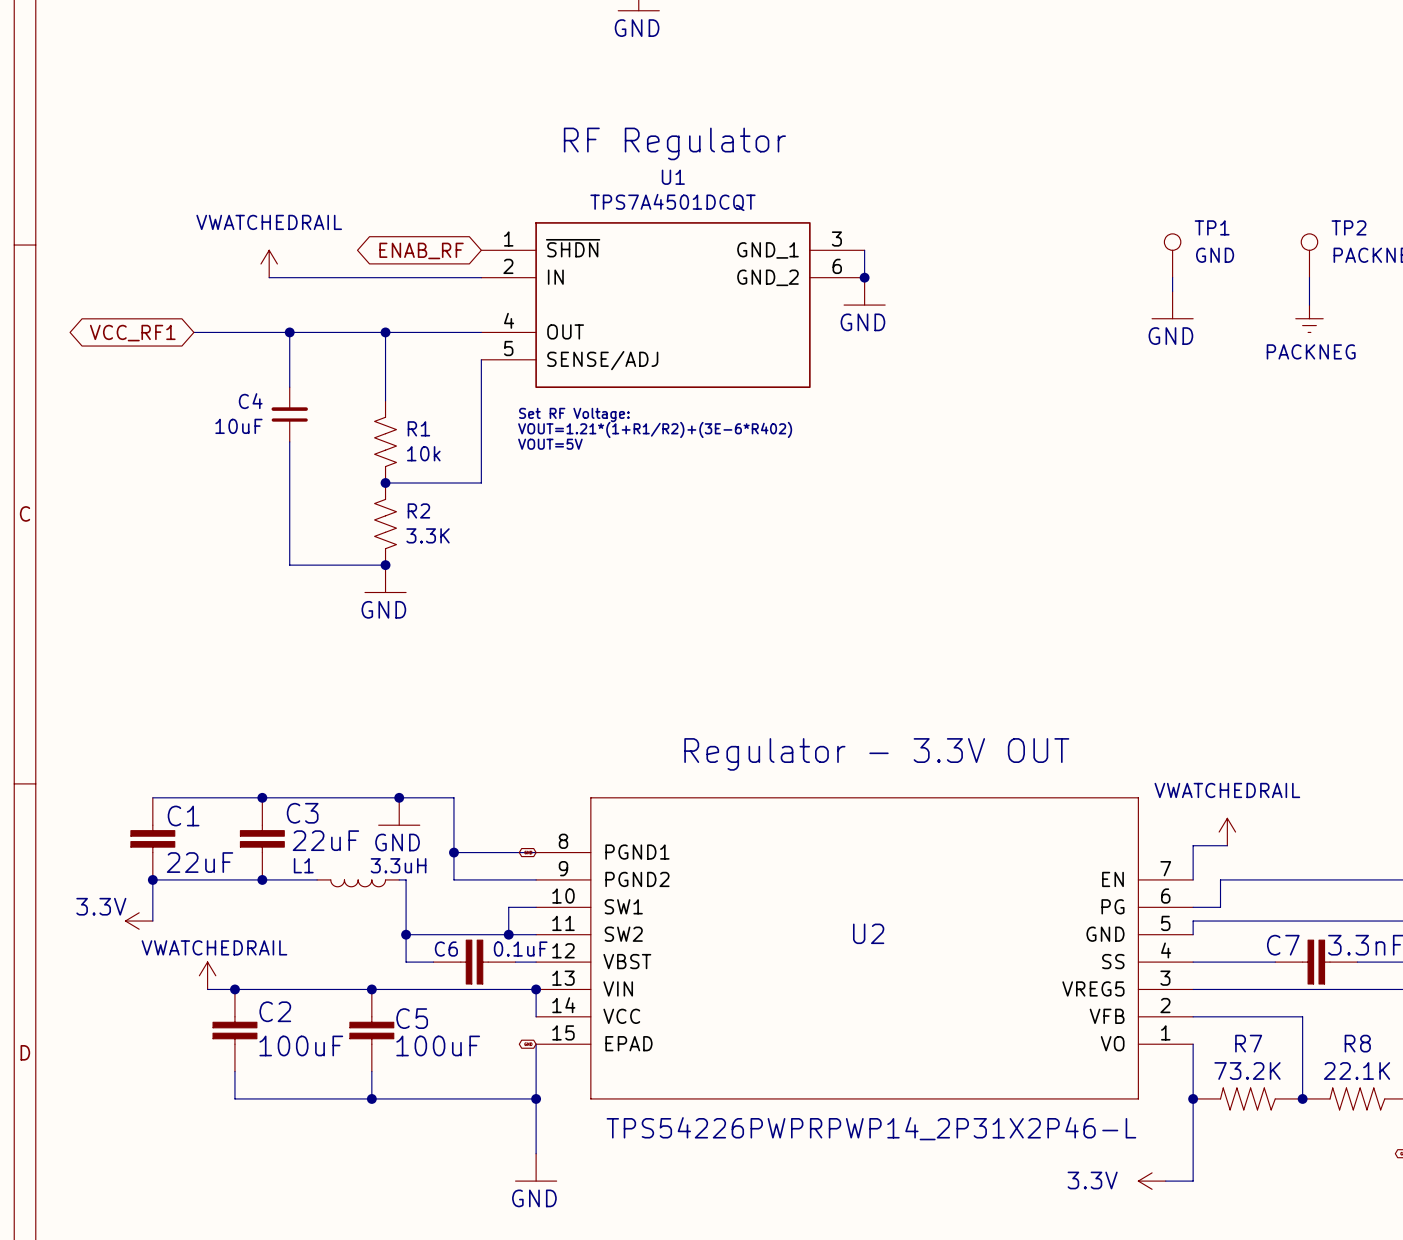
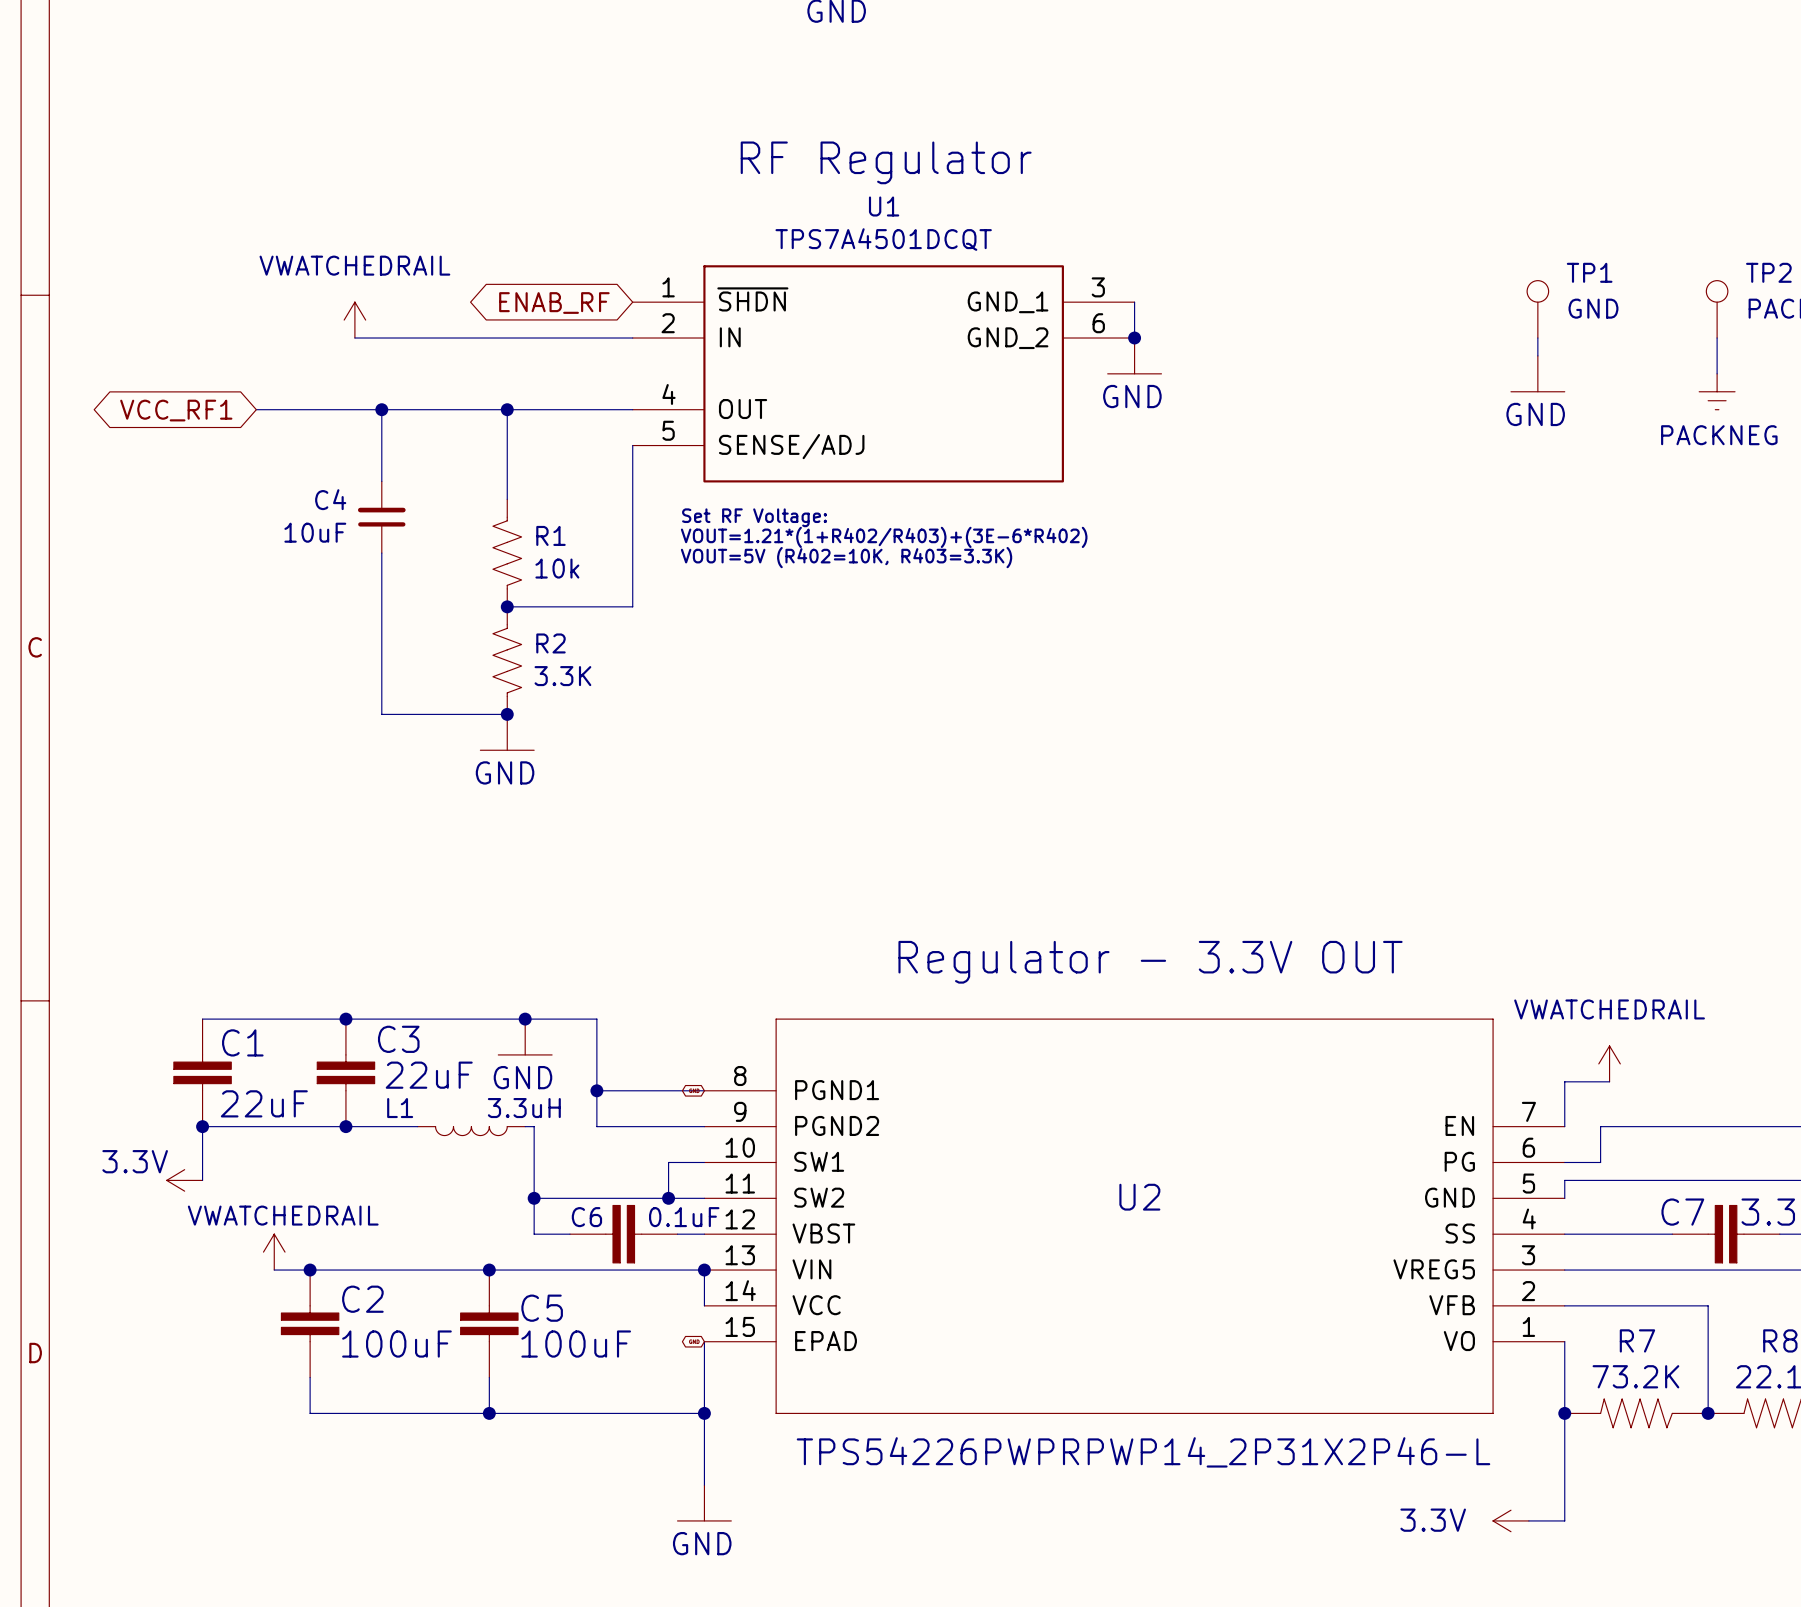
text: VOUT=1.21*(1+R1/R2)+(3E-6*R402) (655, 429) -> VOUT=1.21*(1+R402/R403)+(3E-6*R402) (884, 537)
text: VOUT=5V (550, 444) -> VOUT=5V (R402=10K, R403=3.3K) (846, 557)

